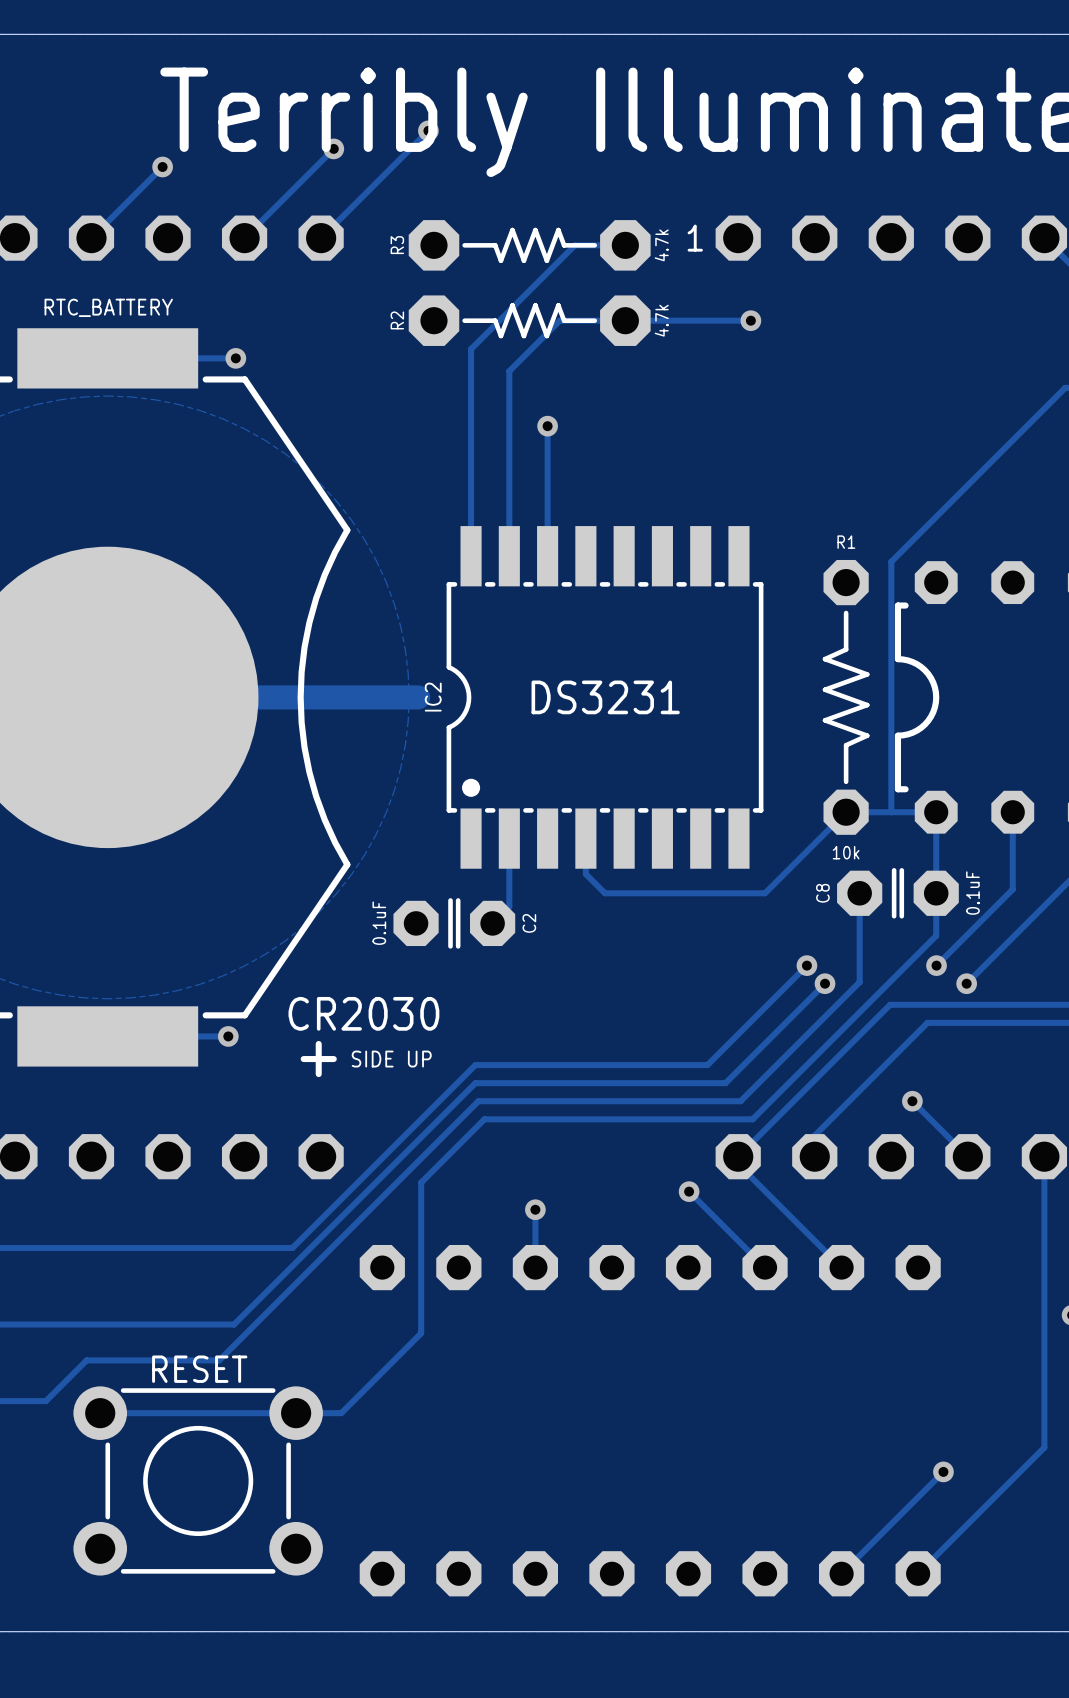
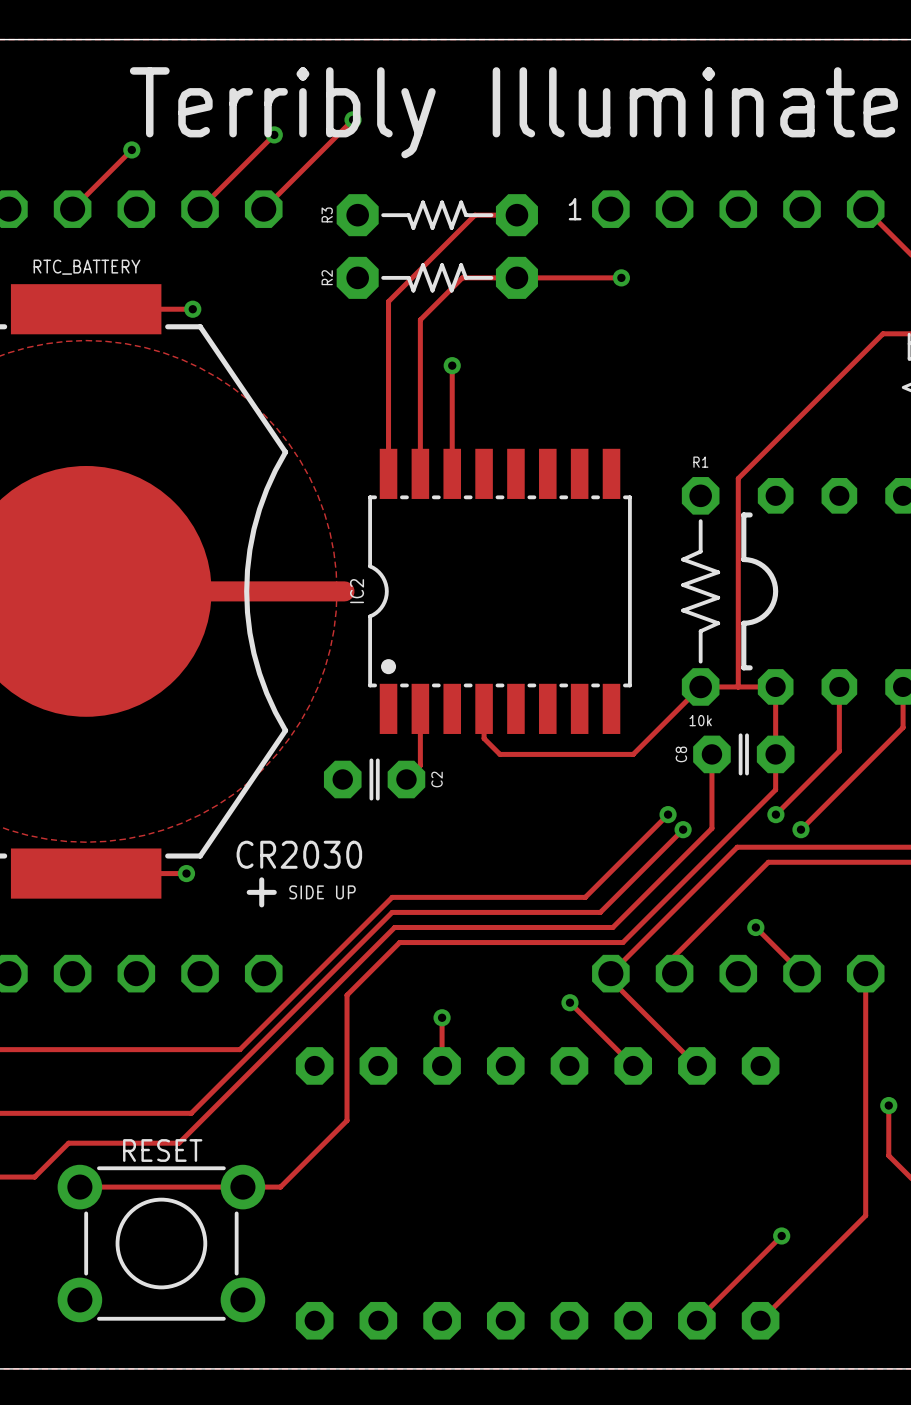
R3 value: 4.7k (661, 245) -> none
R2 value: 4.7k (661, 320) -> none
IC2 value: DS3231 (605, 697) -> none
C8 value: 0.1uF (972, 893) -> none
C2 value: 0.1uF (379, 923) -> none

